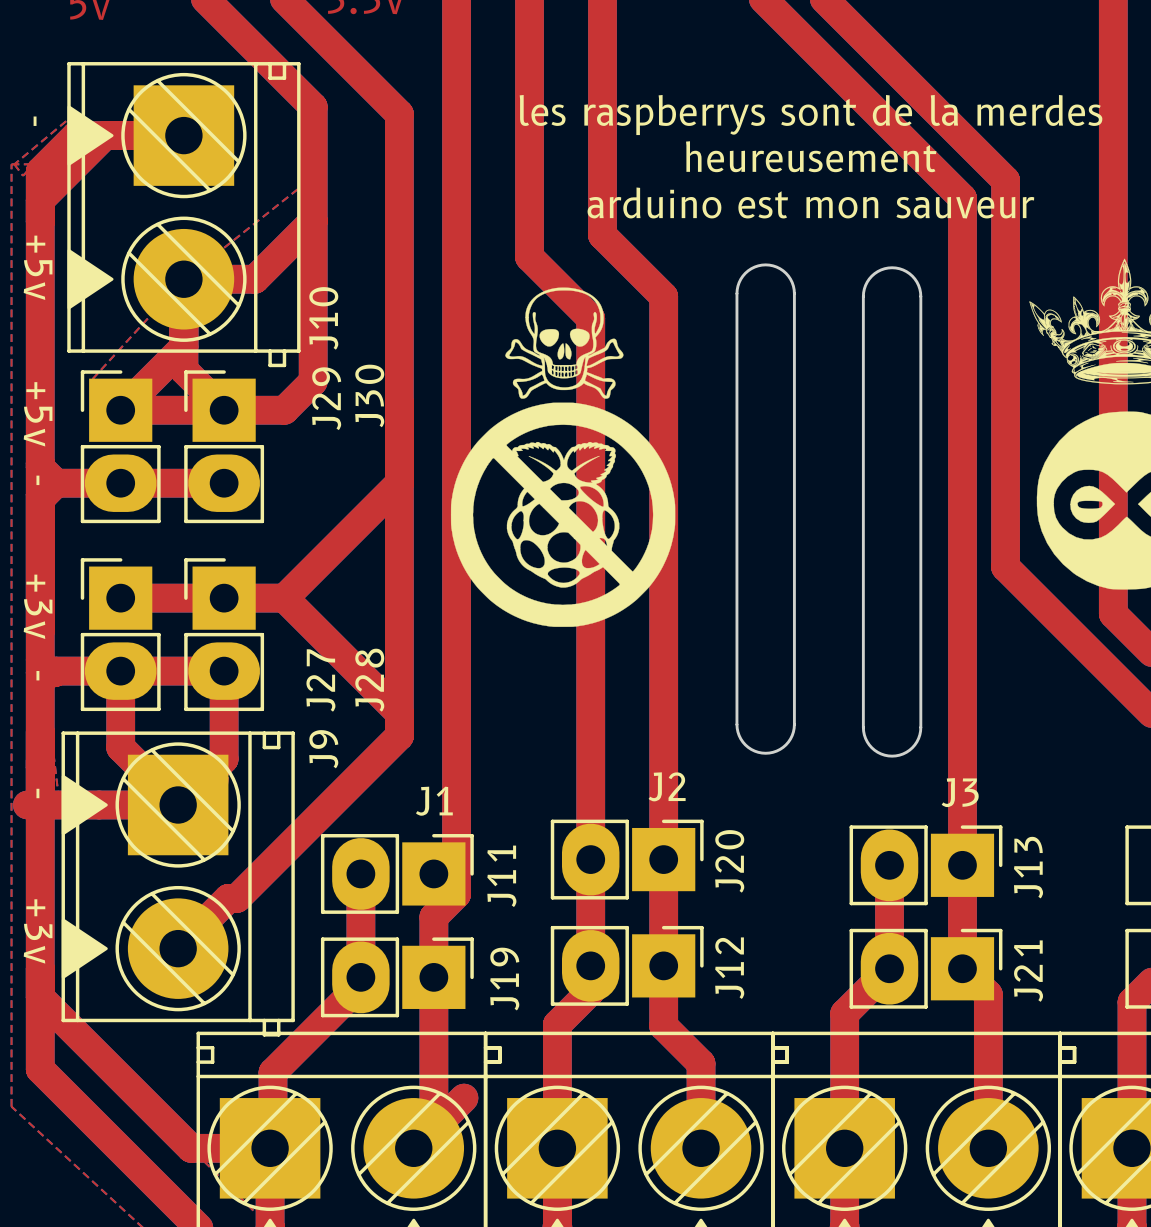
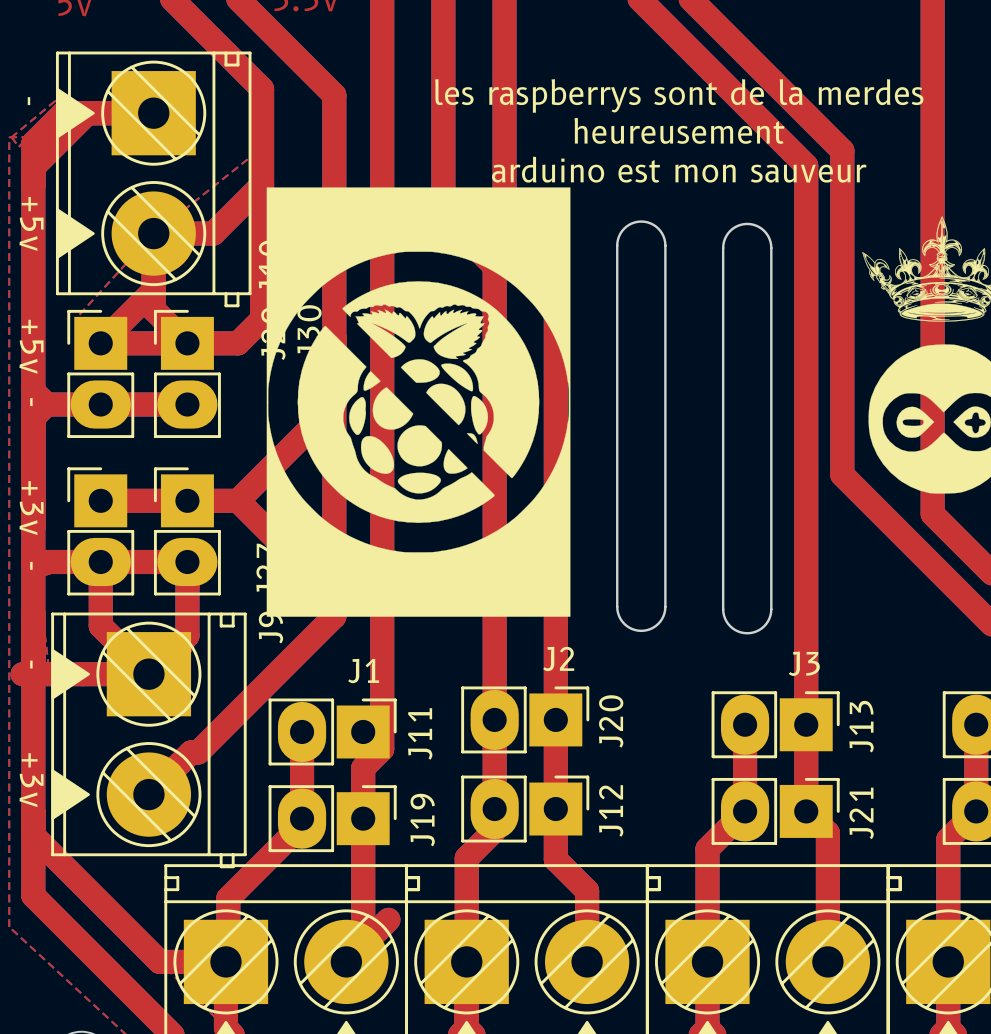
drawing: none -> [266, 187, 571, 617]
drawing: [450, 287, 676, 627] -> none

